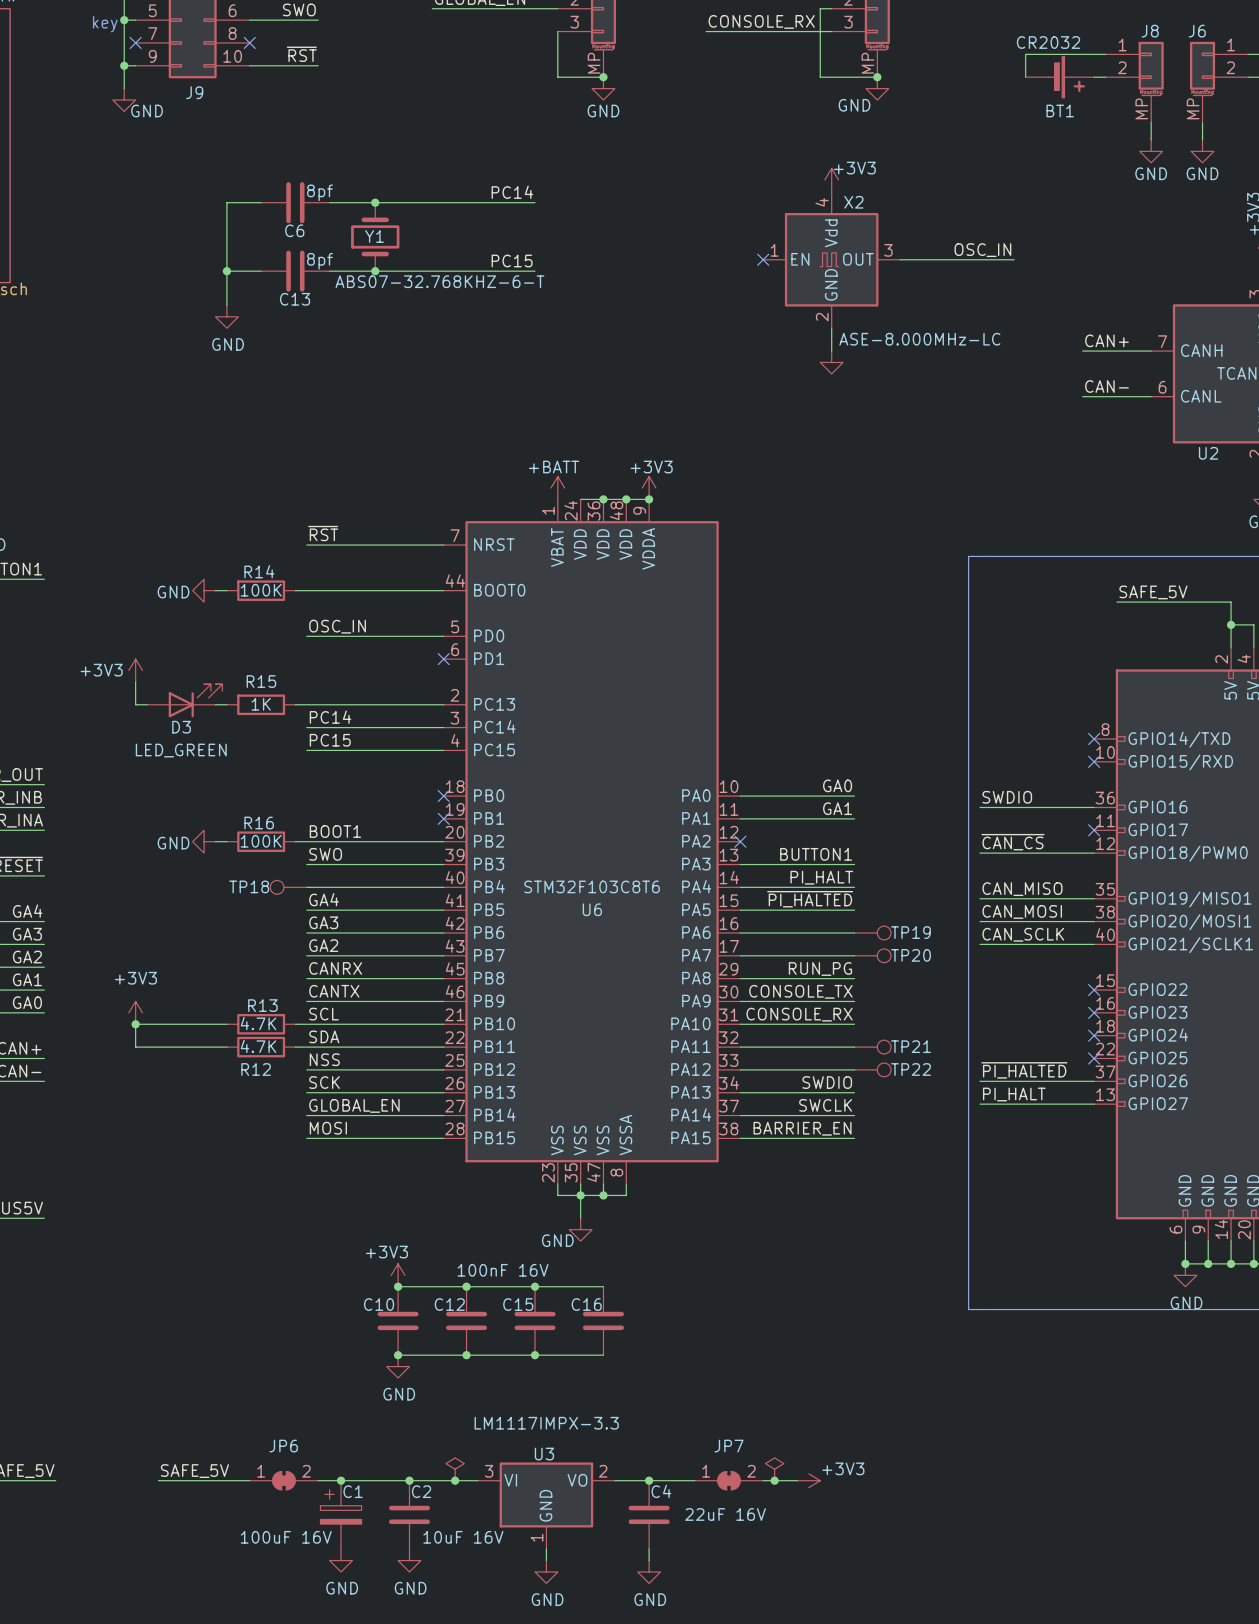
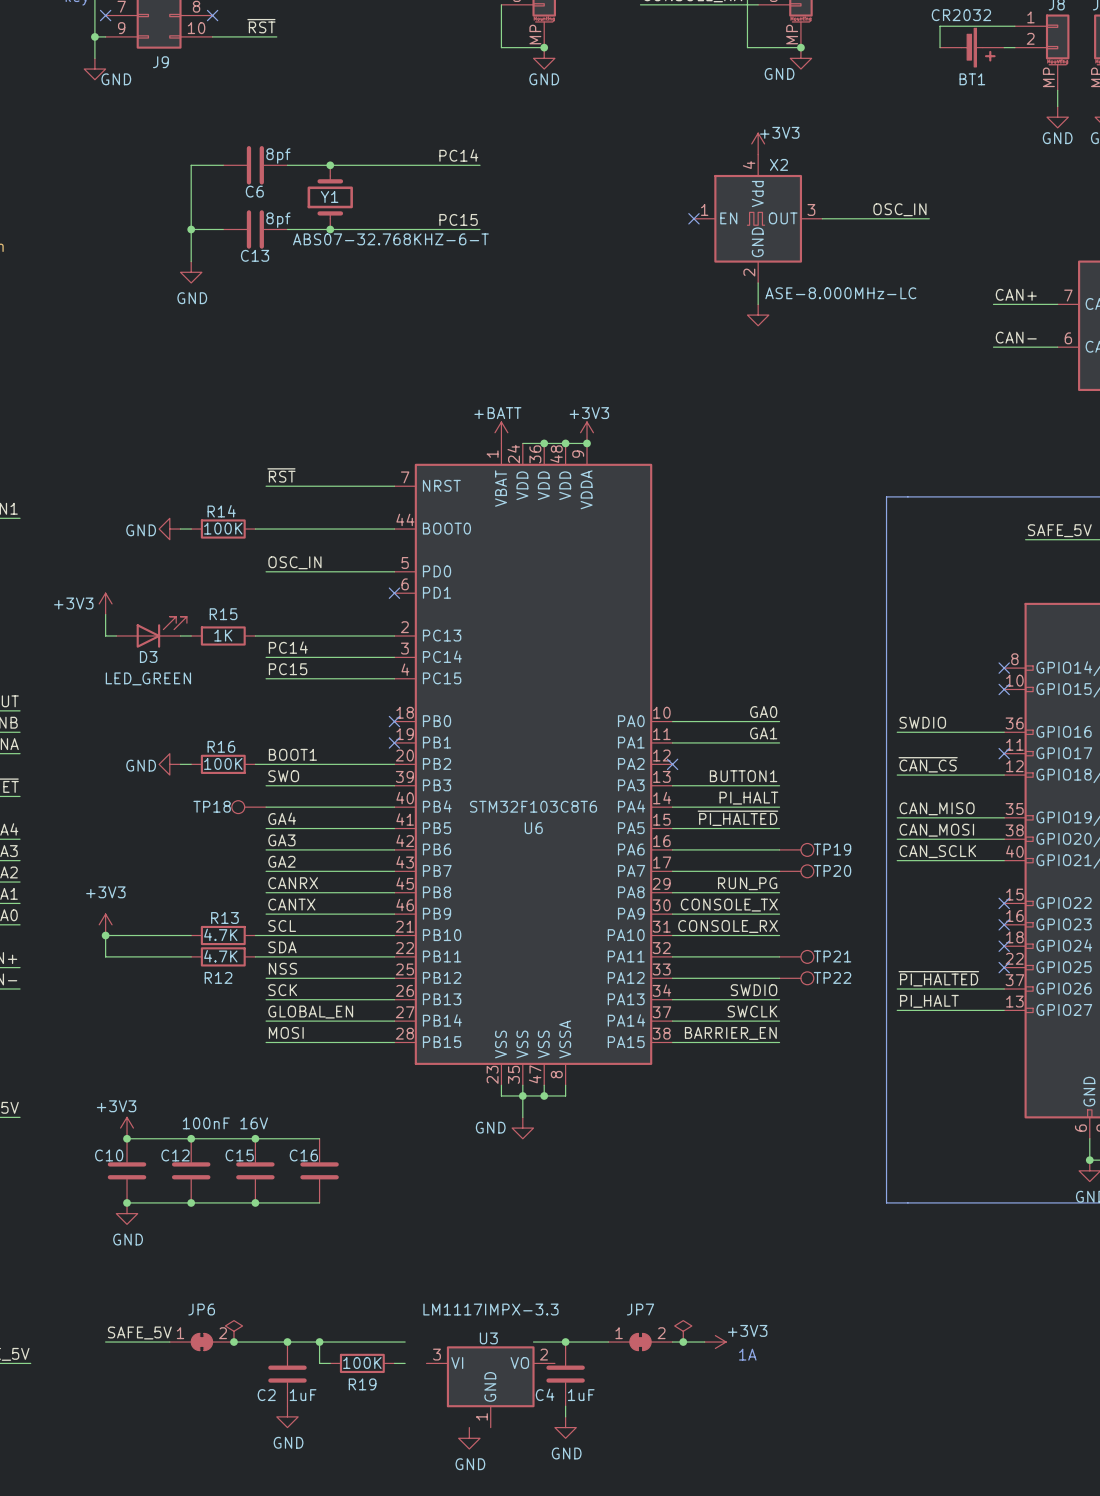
power symbol: none -> +3V3 (127, 1128)
power symbol text position: GND (557, 1240) -> GND (490, 1127)
wire: none -> (127, 1138) (319, 1138)
junction: none -> (127, 1138)
junction: none -> (191, 1138)
junction: none -> (255, 1138)
power symbol: +3V3 (398, 1275) -> none
wire: (398, 1286) (603, 1286) -> none
junction: (398, 1286) -> none
junction: (466, 1286) -> none
junction: (535, 1286) -> none
wire: none -> (127, 1202) (319, 1202)
junction: none -> (127, 1202)
junction: none -> (191, 1202)
junction: none -> (255, 1202)
power symbol: none -> GND (127, 1213)
C10 position: (398, 1320) -> (127, 1170)
C12 position: (466, 1320) -> (191, 1170)
C15 position: (535, 1320) -> (255, 1170)
C16 position: (603, 1320) -> (319, 1170)
wire: (398, 1355) (603, 1355) -> none
junction: (398, 1355) -> none
junction: (466, 1355) -> none
junction: (535, 1355) -> none
power symbol: GND (398, 1366) -> none
power symbol: none -> (233, 1331)
wire: none -> (105, 1342) (169, 1342)
wire: none -> (233, 1342) (405, 1342)
junction: none -> (233, 1342)
junction: none -> (287, 1342)
junction: none -> (319, 1342)
power symbol: (455, 1469) -> none
power symbol position: (774, 1469) -> (683, 1331)
label position: SAFE_5V (194, 1471) -> SAFE_5V (139, 1332)
text: none -> 1A (747, 1354)
wire: (158, 1480) (249, 1480) -> none
JP6 position: (283, 1480) -> (201, 1342)
wire: (318, 1480) (363, 1480) -> (319, 1342) (319, 1363)
junction: (341, 1480) -> none
junction: (409, 1480) -> none
R19: none -> 100K (362, 1363)
wire: (455, 1480) (477, 1480) -> none
junction: (455, 1480) -> none
wire: (614, 1480) (694, 1480) -> (533, 1342) (608, 1342)
junction position: (649, 1480) -> (565, 1342)
JP7 position: (728, 1480) -> (640, 1342)
wire: (763, 1480) (797, 1480) -> (672, 1342) (704, 1342)
junction position: (774, 1480) -> (683, 1342)
power symbol position: +3V3 (808, 1480) -> +3V3 (715, 1342)
C2 name position: C2 (421, 1491) -> C2 (266, 1395)
C4 name position: C4 (661, 1491) -> C4 (545, 1394)
C1: 100uF 16V (341, 1514) -> none
C2 position: (409, 1514) -> (287, 1374)
C4 position: (649, 1514) -> (565, 1374)
C4 value: 22uF 16V (725, 1514) -> 1uF (581, 1395)
C2 value: 10uF 16V (463, 1537) -> 1uF (303, 1395)
wire: (546, 1549) (546, 1560) -> none
wire: (649, 1549) (649, 1560) -> (565, 1406) (565, 1416)
power symbol position: GND (341, 1560) -> GND (287, 1416)
power symbol: GND (409, 1560) -> none
power symbol position: GND (546, 1571) -> GND (469, 1438)
power symbol position: GND (649, 1571) -> GND (565, 1427)

